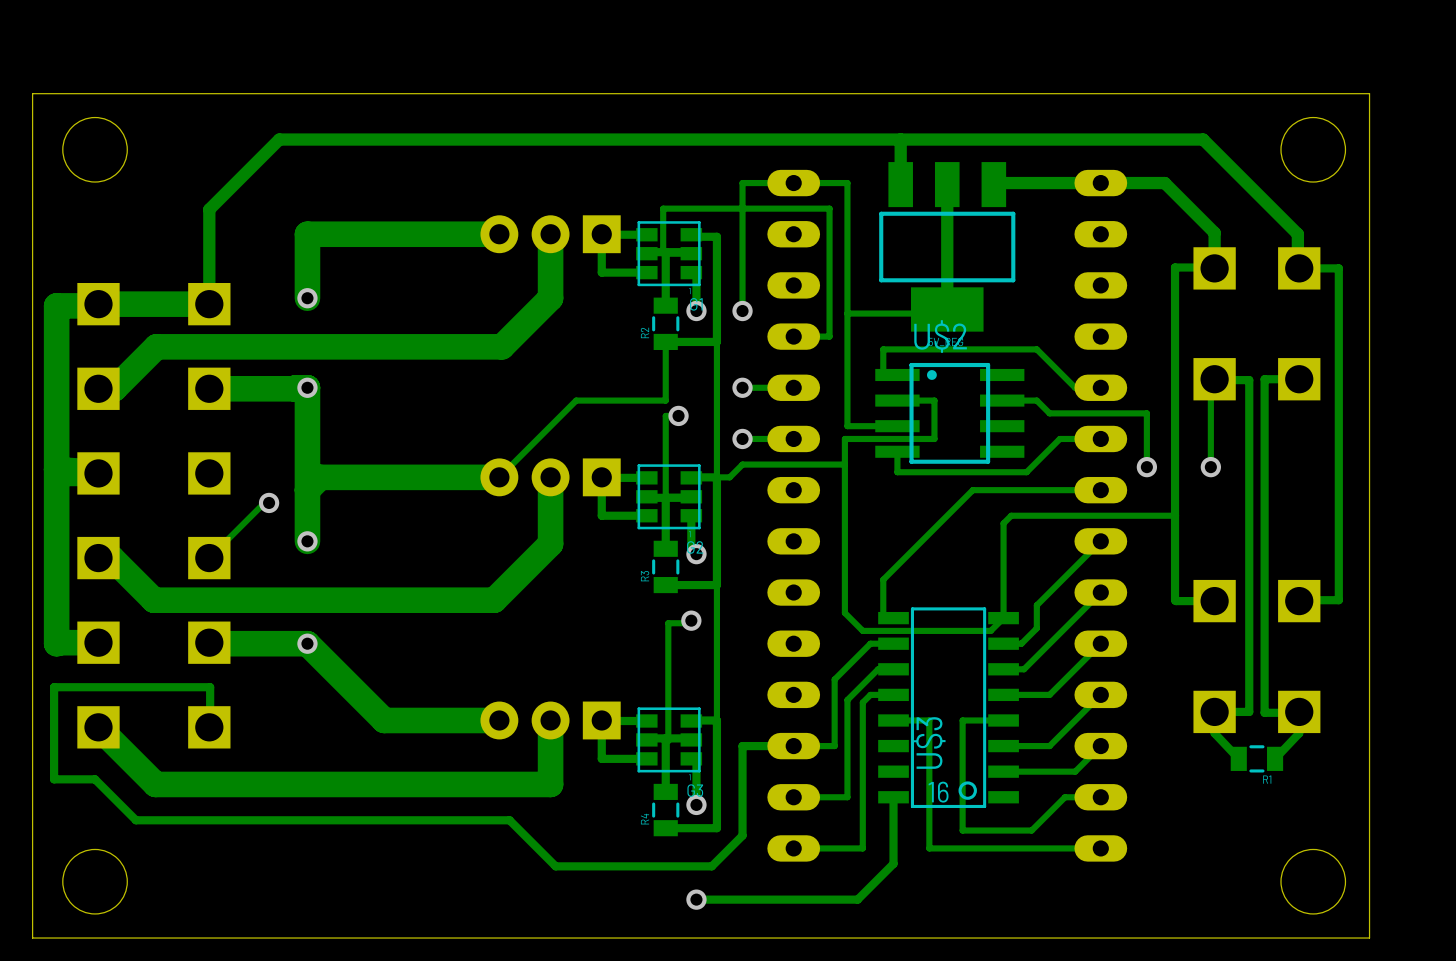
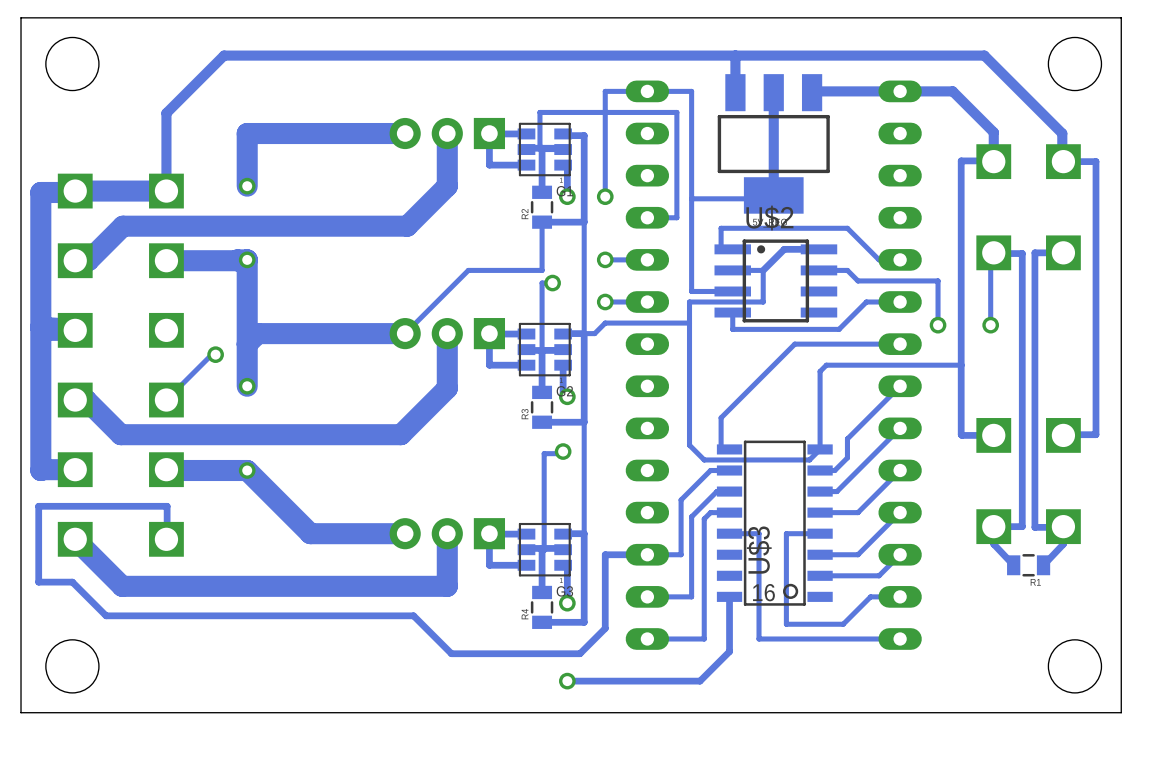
track: none -> (818, 249) (784, 249) (763, 270)

